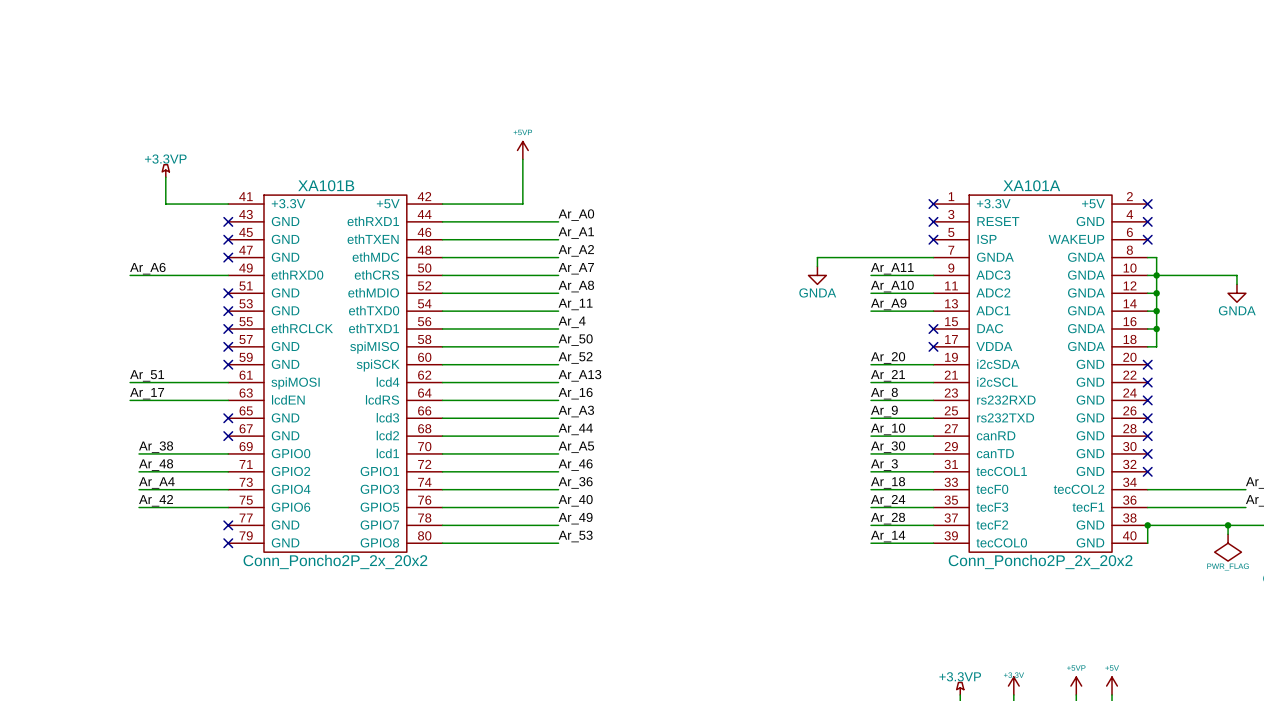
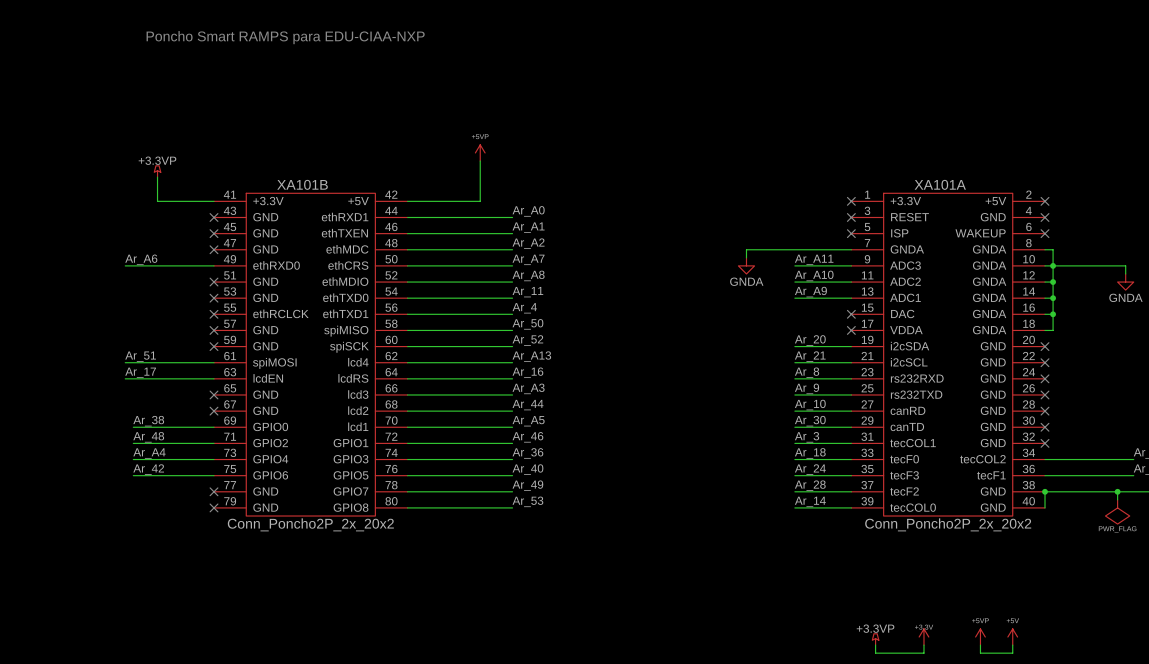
text: none -> Poncho Smart RAMPS para EDU-CIAA-NXP (285, 37)

